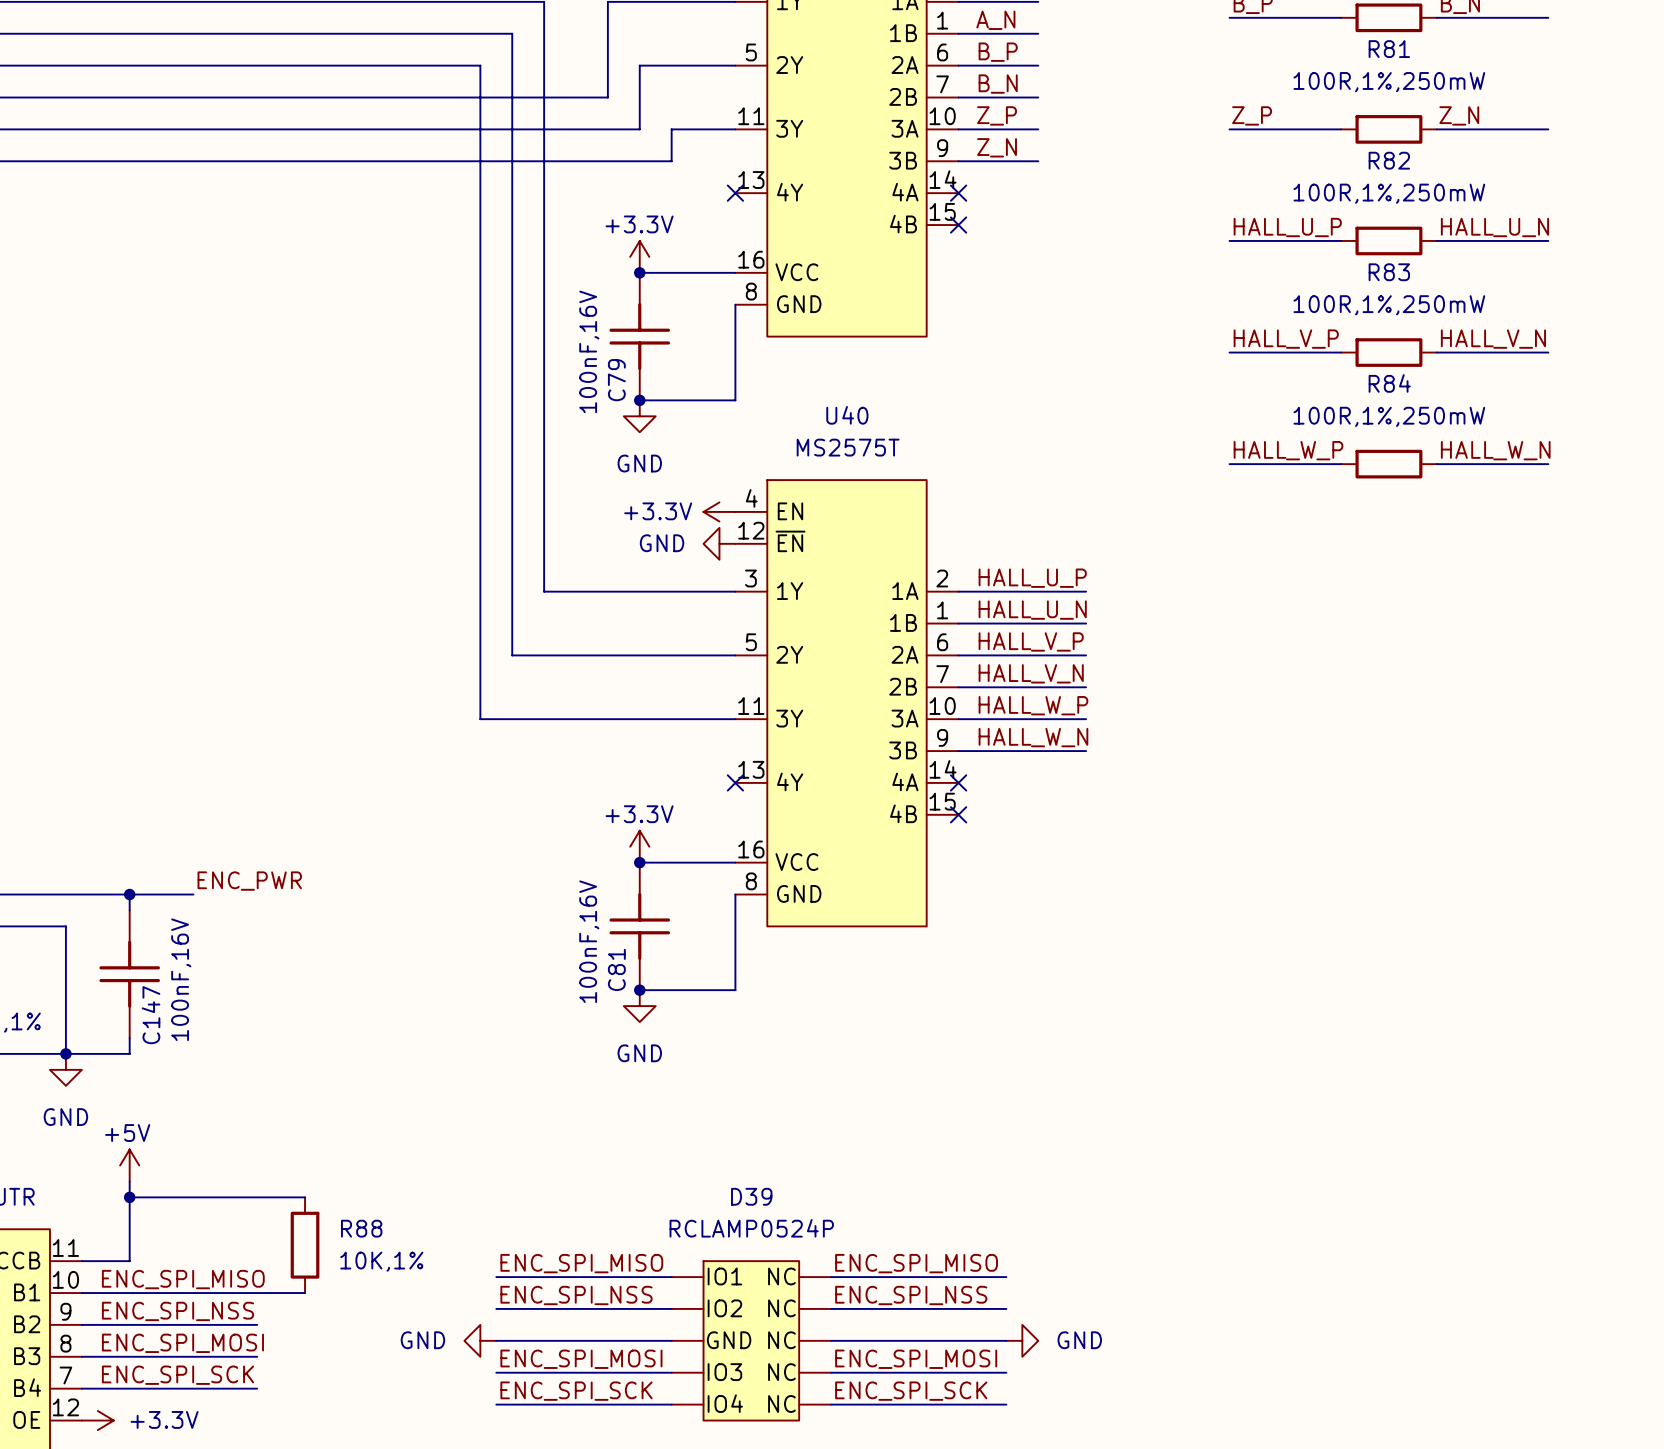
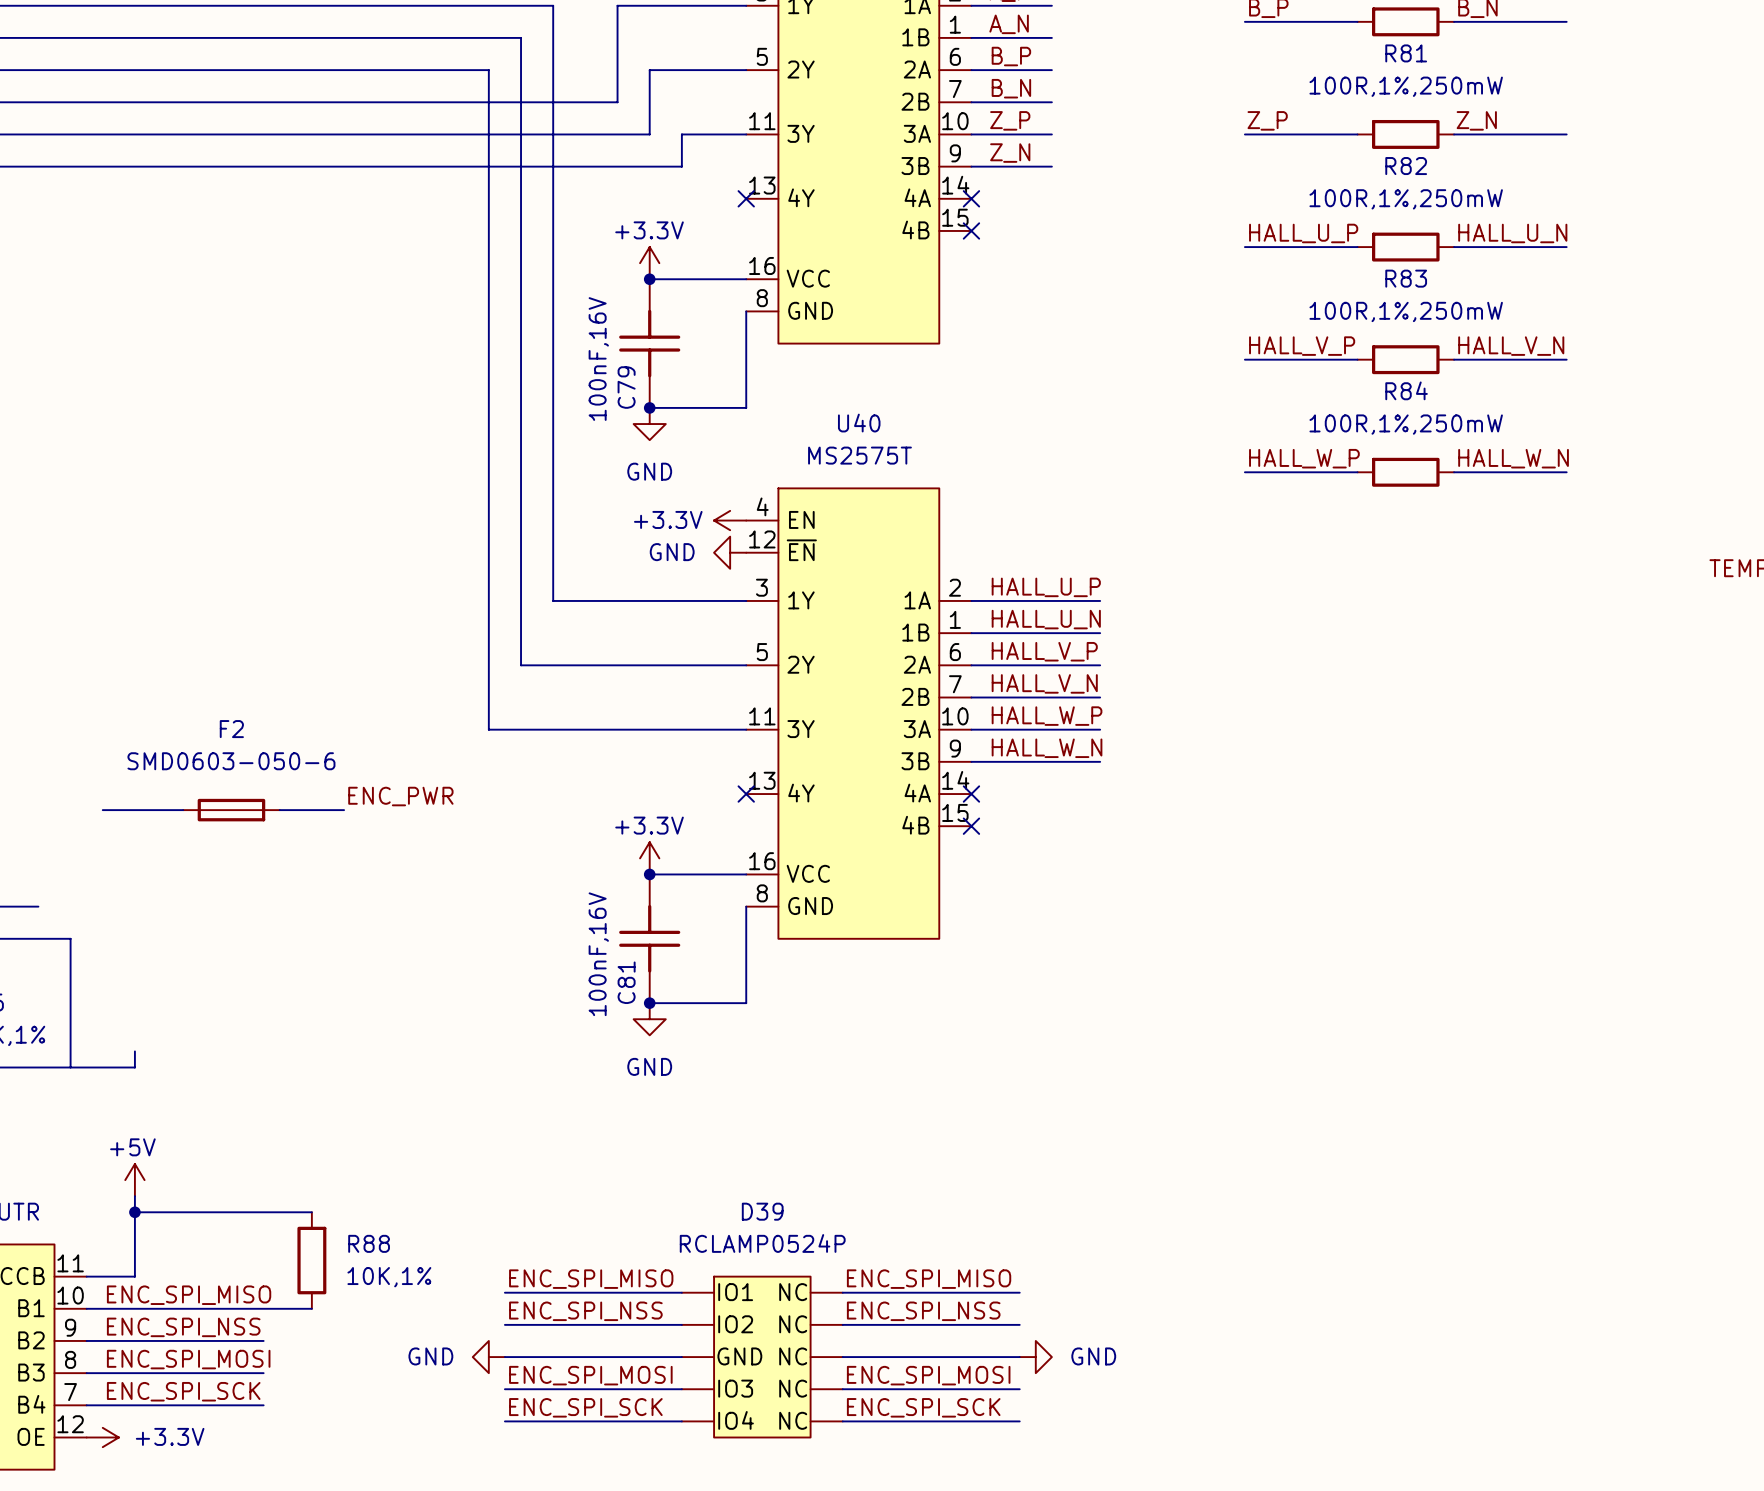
wire: none -> (102, 810) (183, 810)
F2: none -> SMD0603-050-6 (231, 810)
wire: none -> (279, 810) (344, 810)
label position: ENC_PWR (249, 881) -> ENC_PWR (400, 796)
wire: (34, 894) (193, 894) -> none
wire: (129, 894) (129, 910) -> none
junction: (129, 894) -> none
C147: 100nF,16V (129, 974) -> none
junction: (65, 1053) -> none
power symbol: GND (65, 1069) -> none

